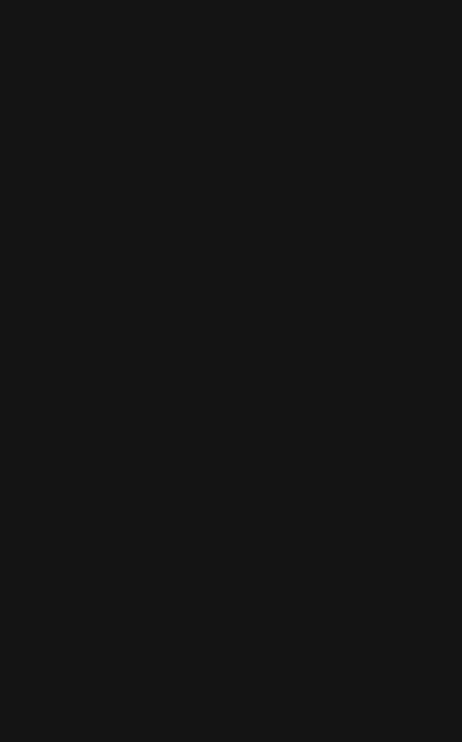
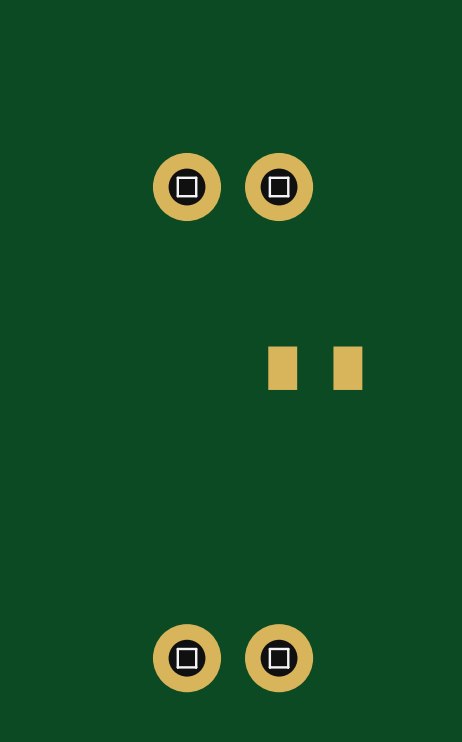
part: none -> (233, 187)
part: none -> (315, 368)
part: none -> (233, 658)

